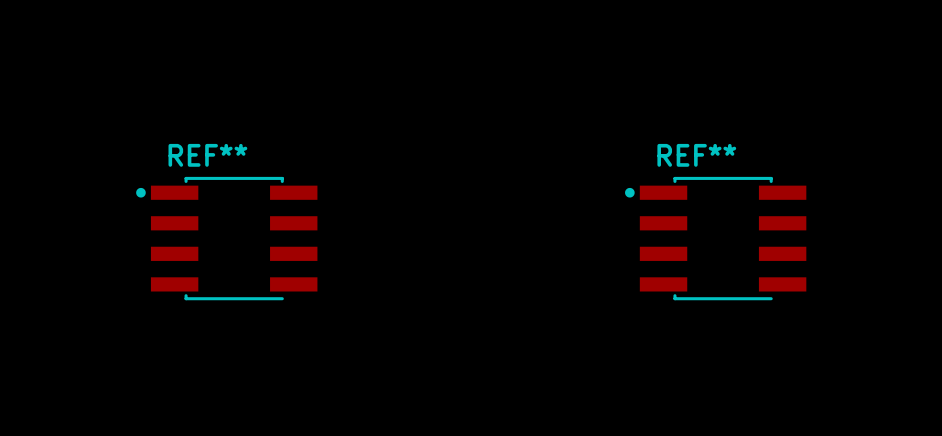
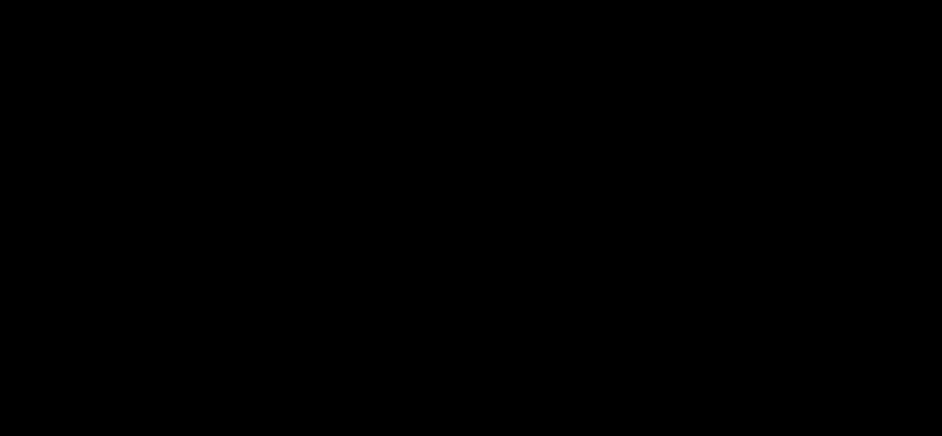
REF**: (226, 238) -> none
REF**: (715, 238) -> none

